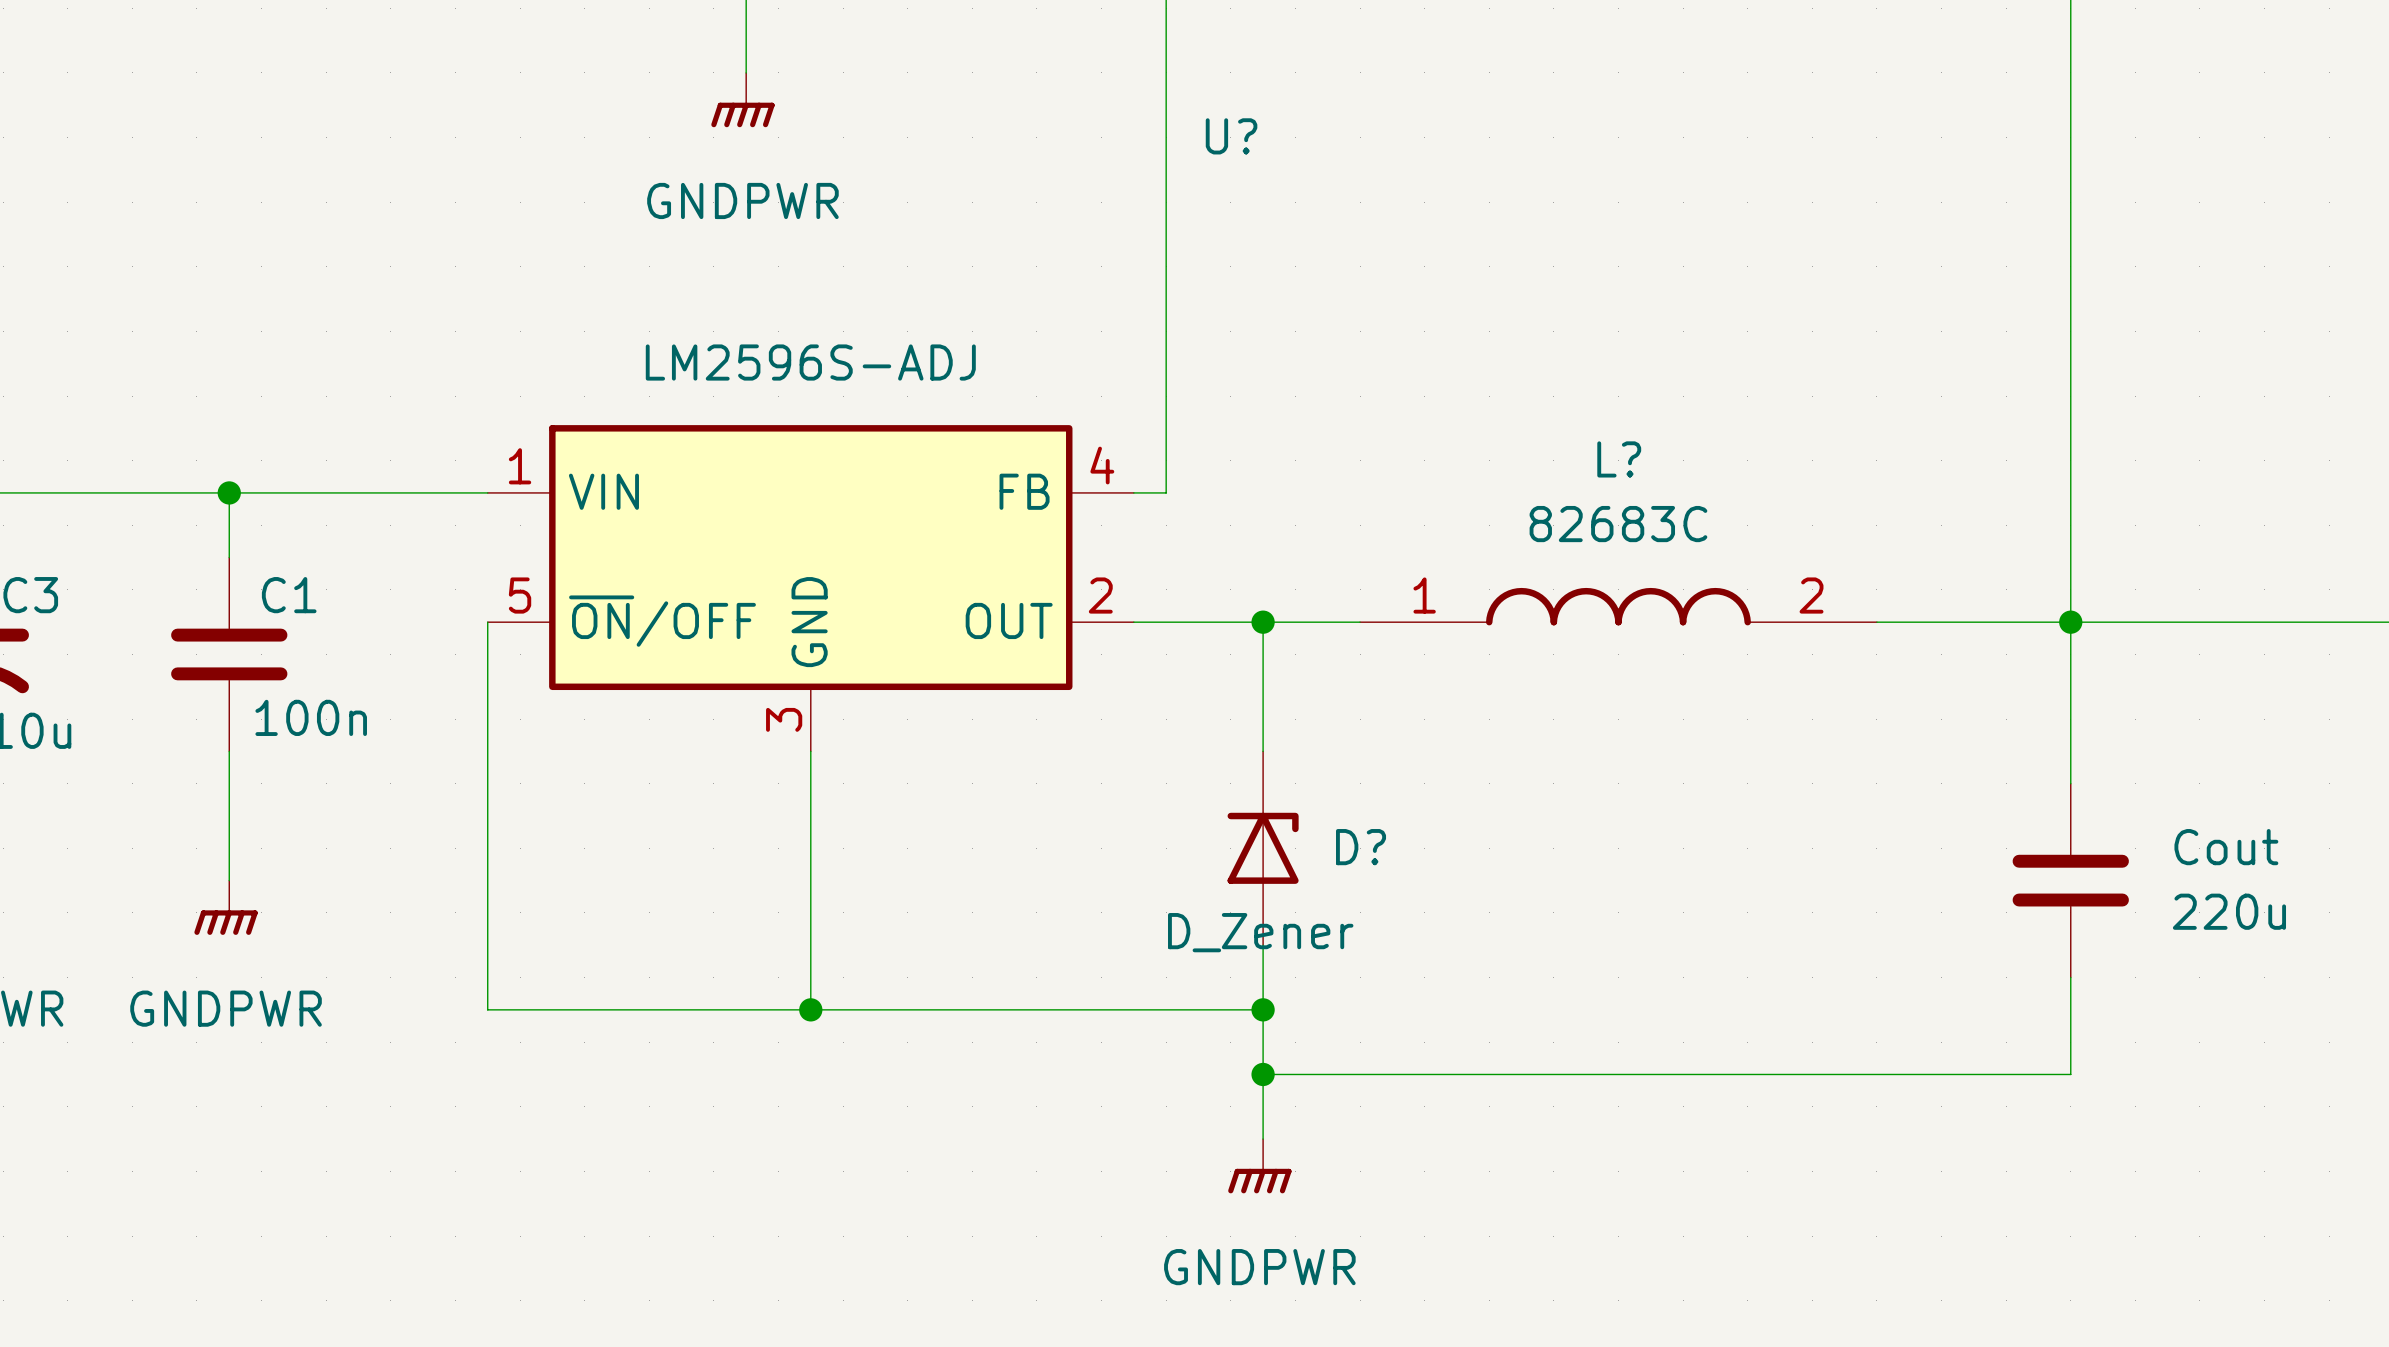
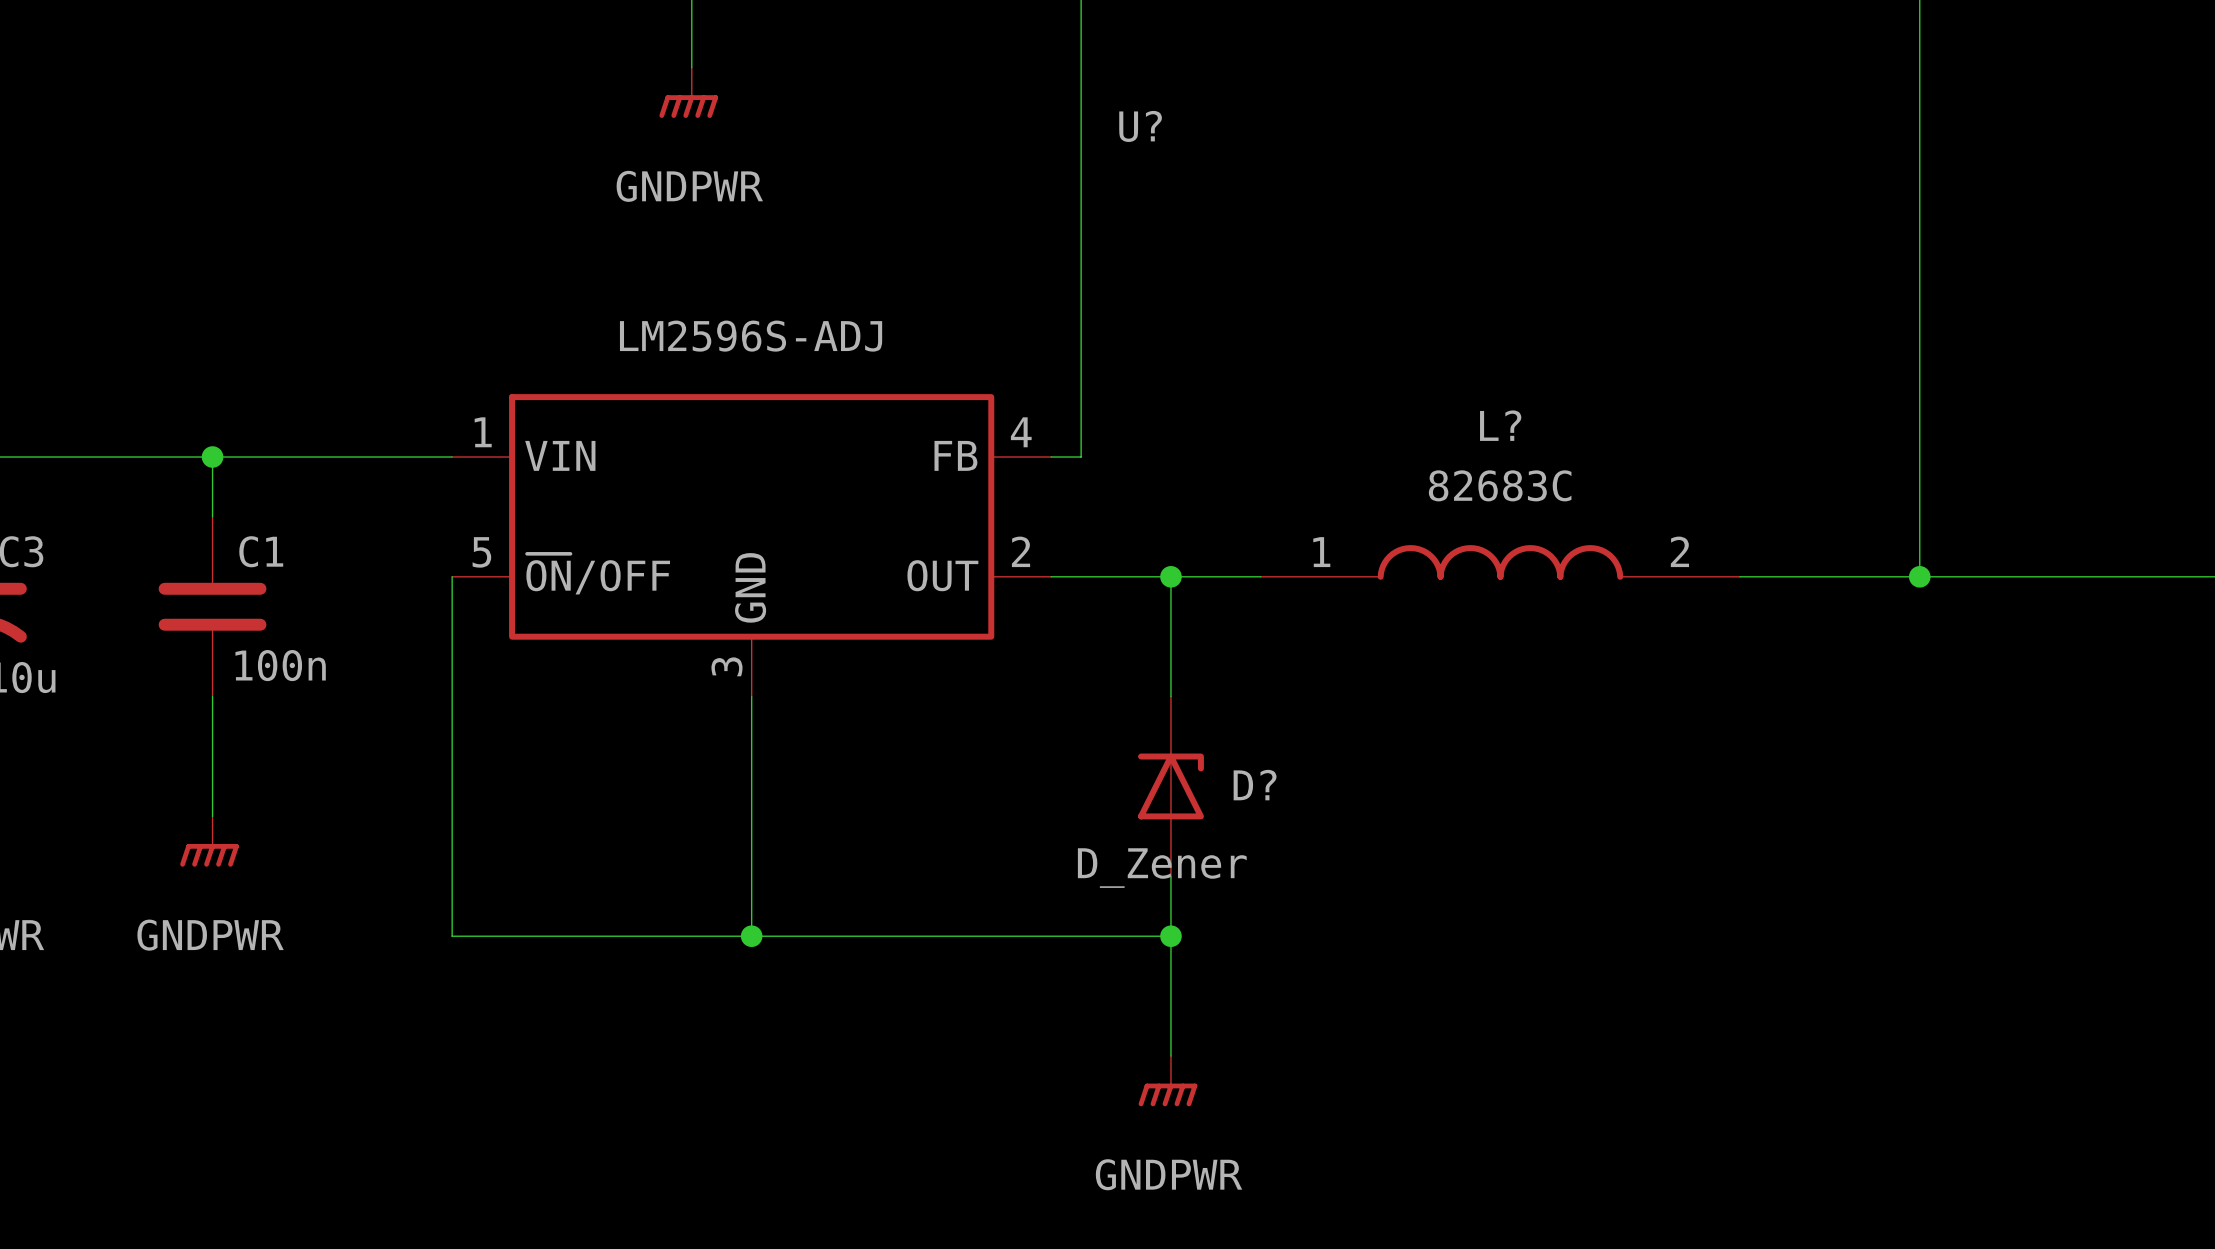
wire: (2070, 622) (2070, 783) -> none
Cout: 220u (2070, 880) -> none
wire: (2070, 977) (2070, 1074) (1263, 1074) -> none
junction: (1263, 1074) -> none

